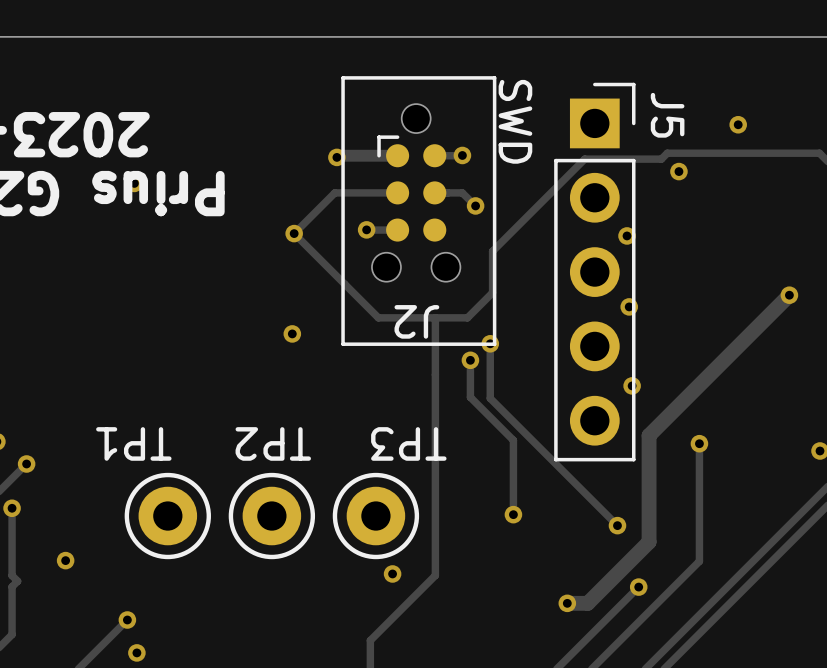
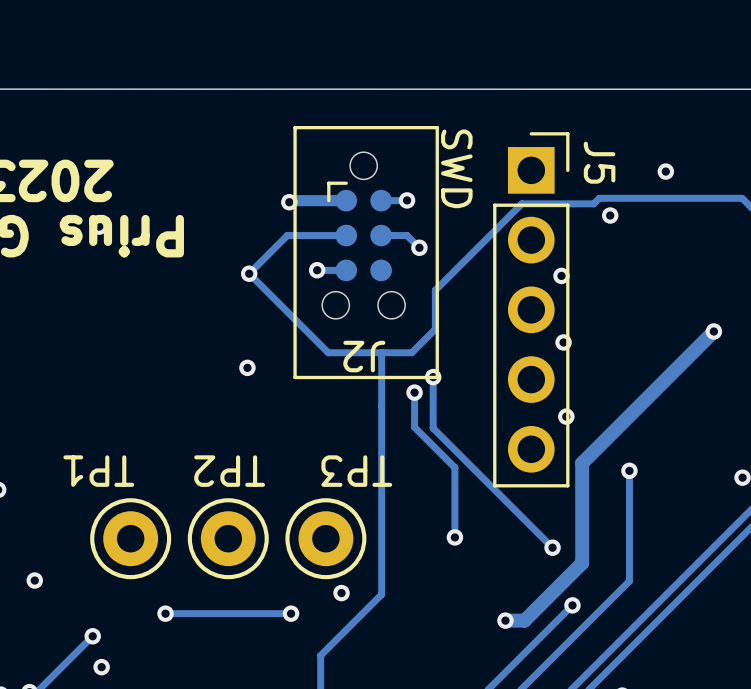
via: none -> (165, 613)
track: none -> (291, 613) (165, 613)
via: none -> (291, 613)

